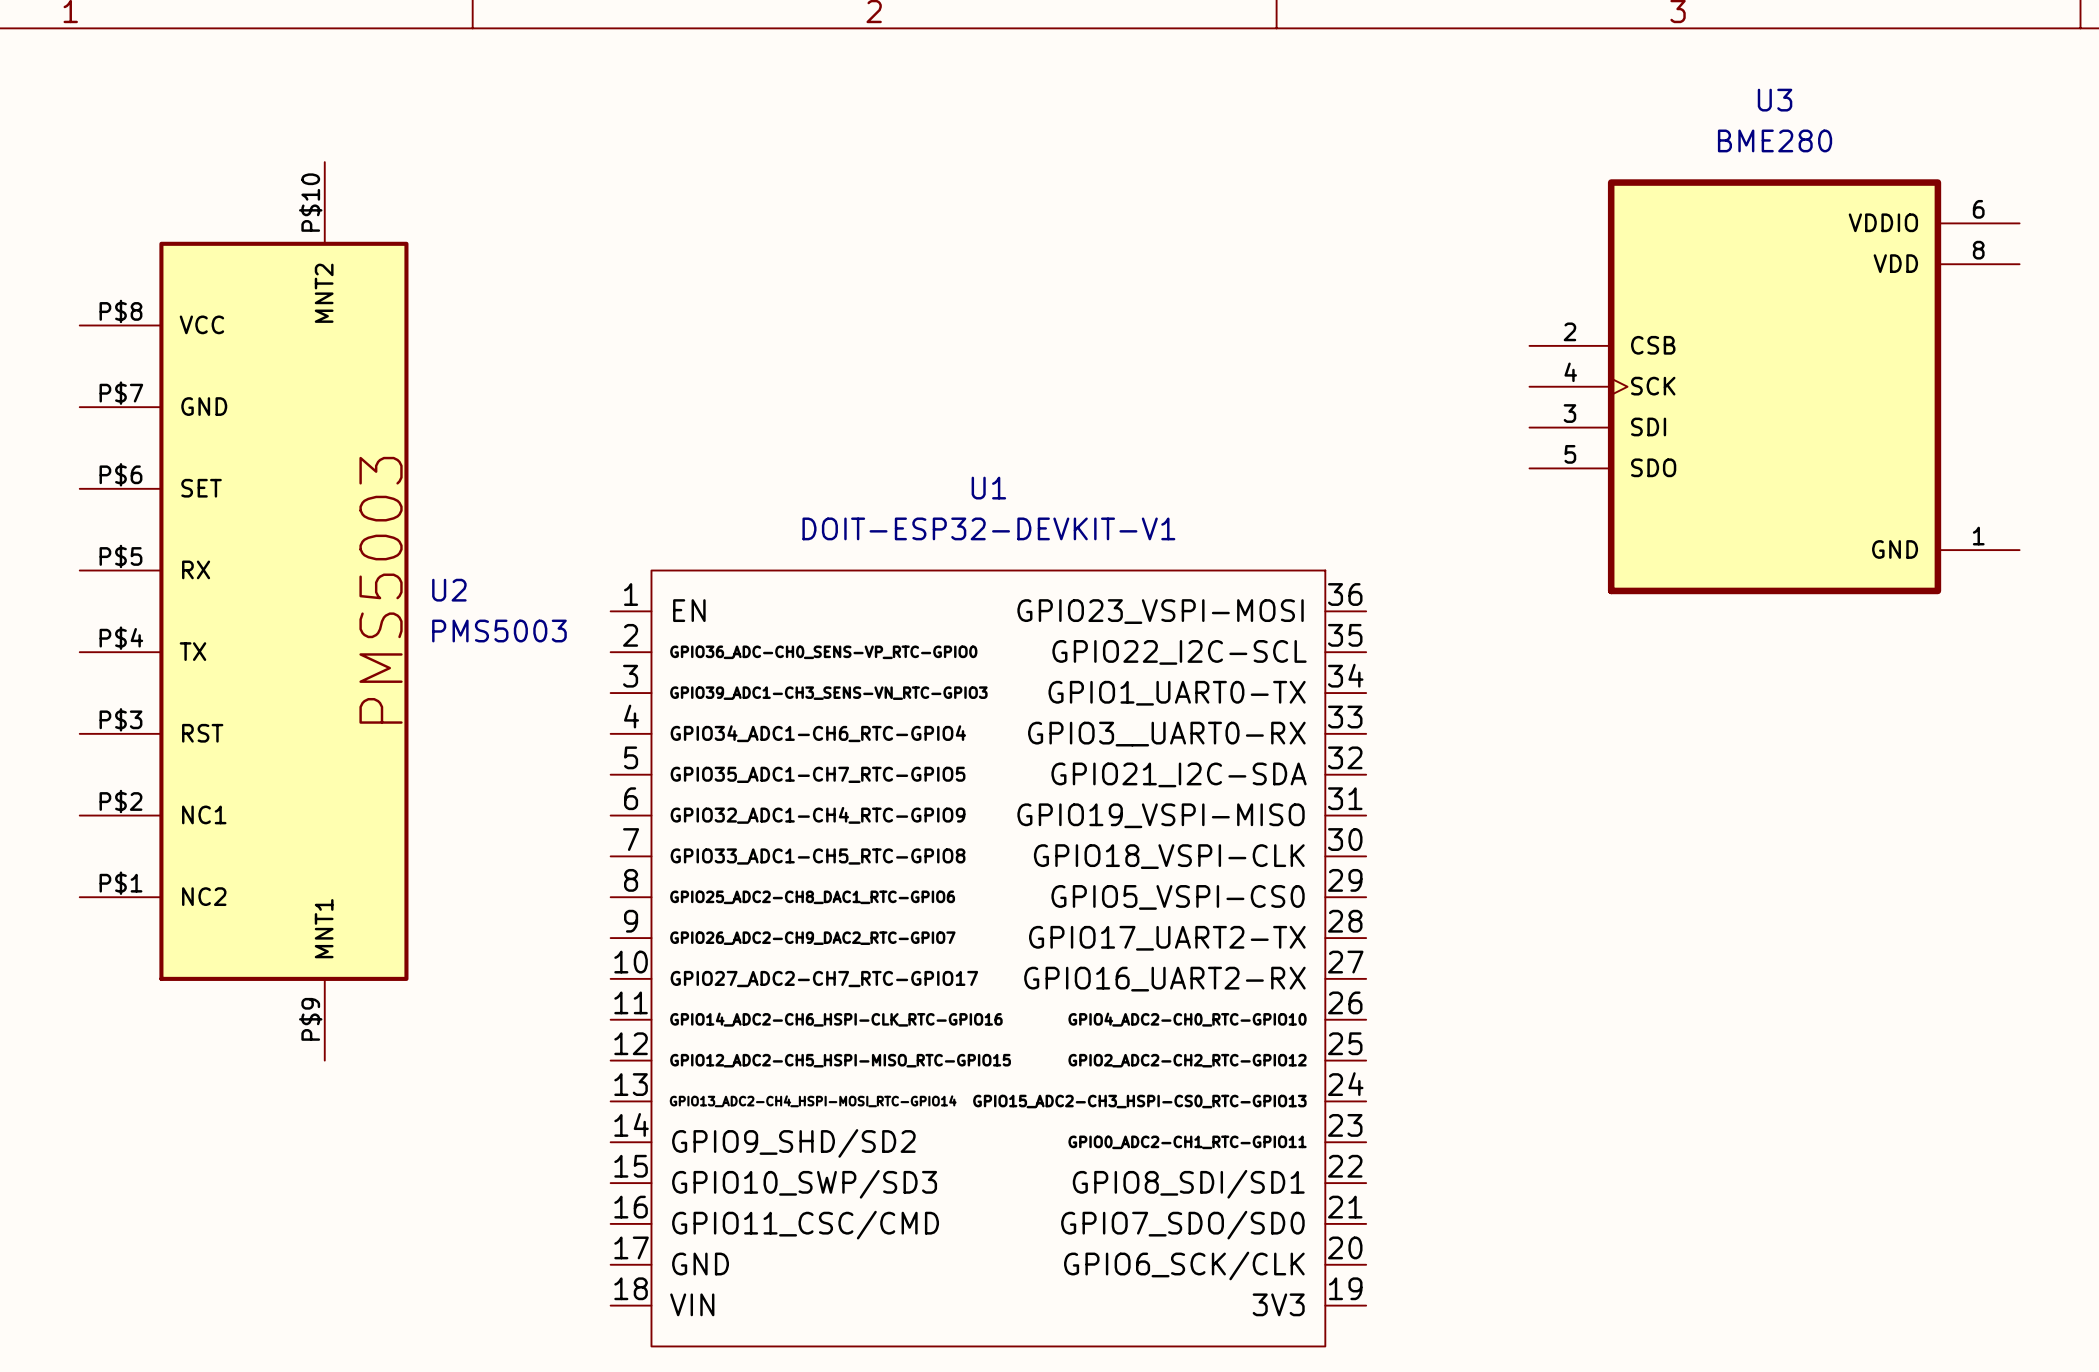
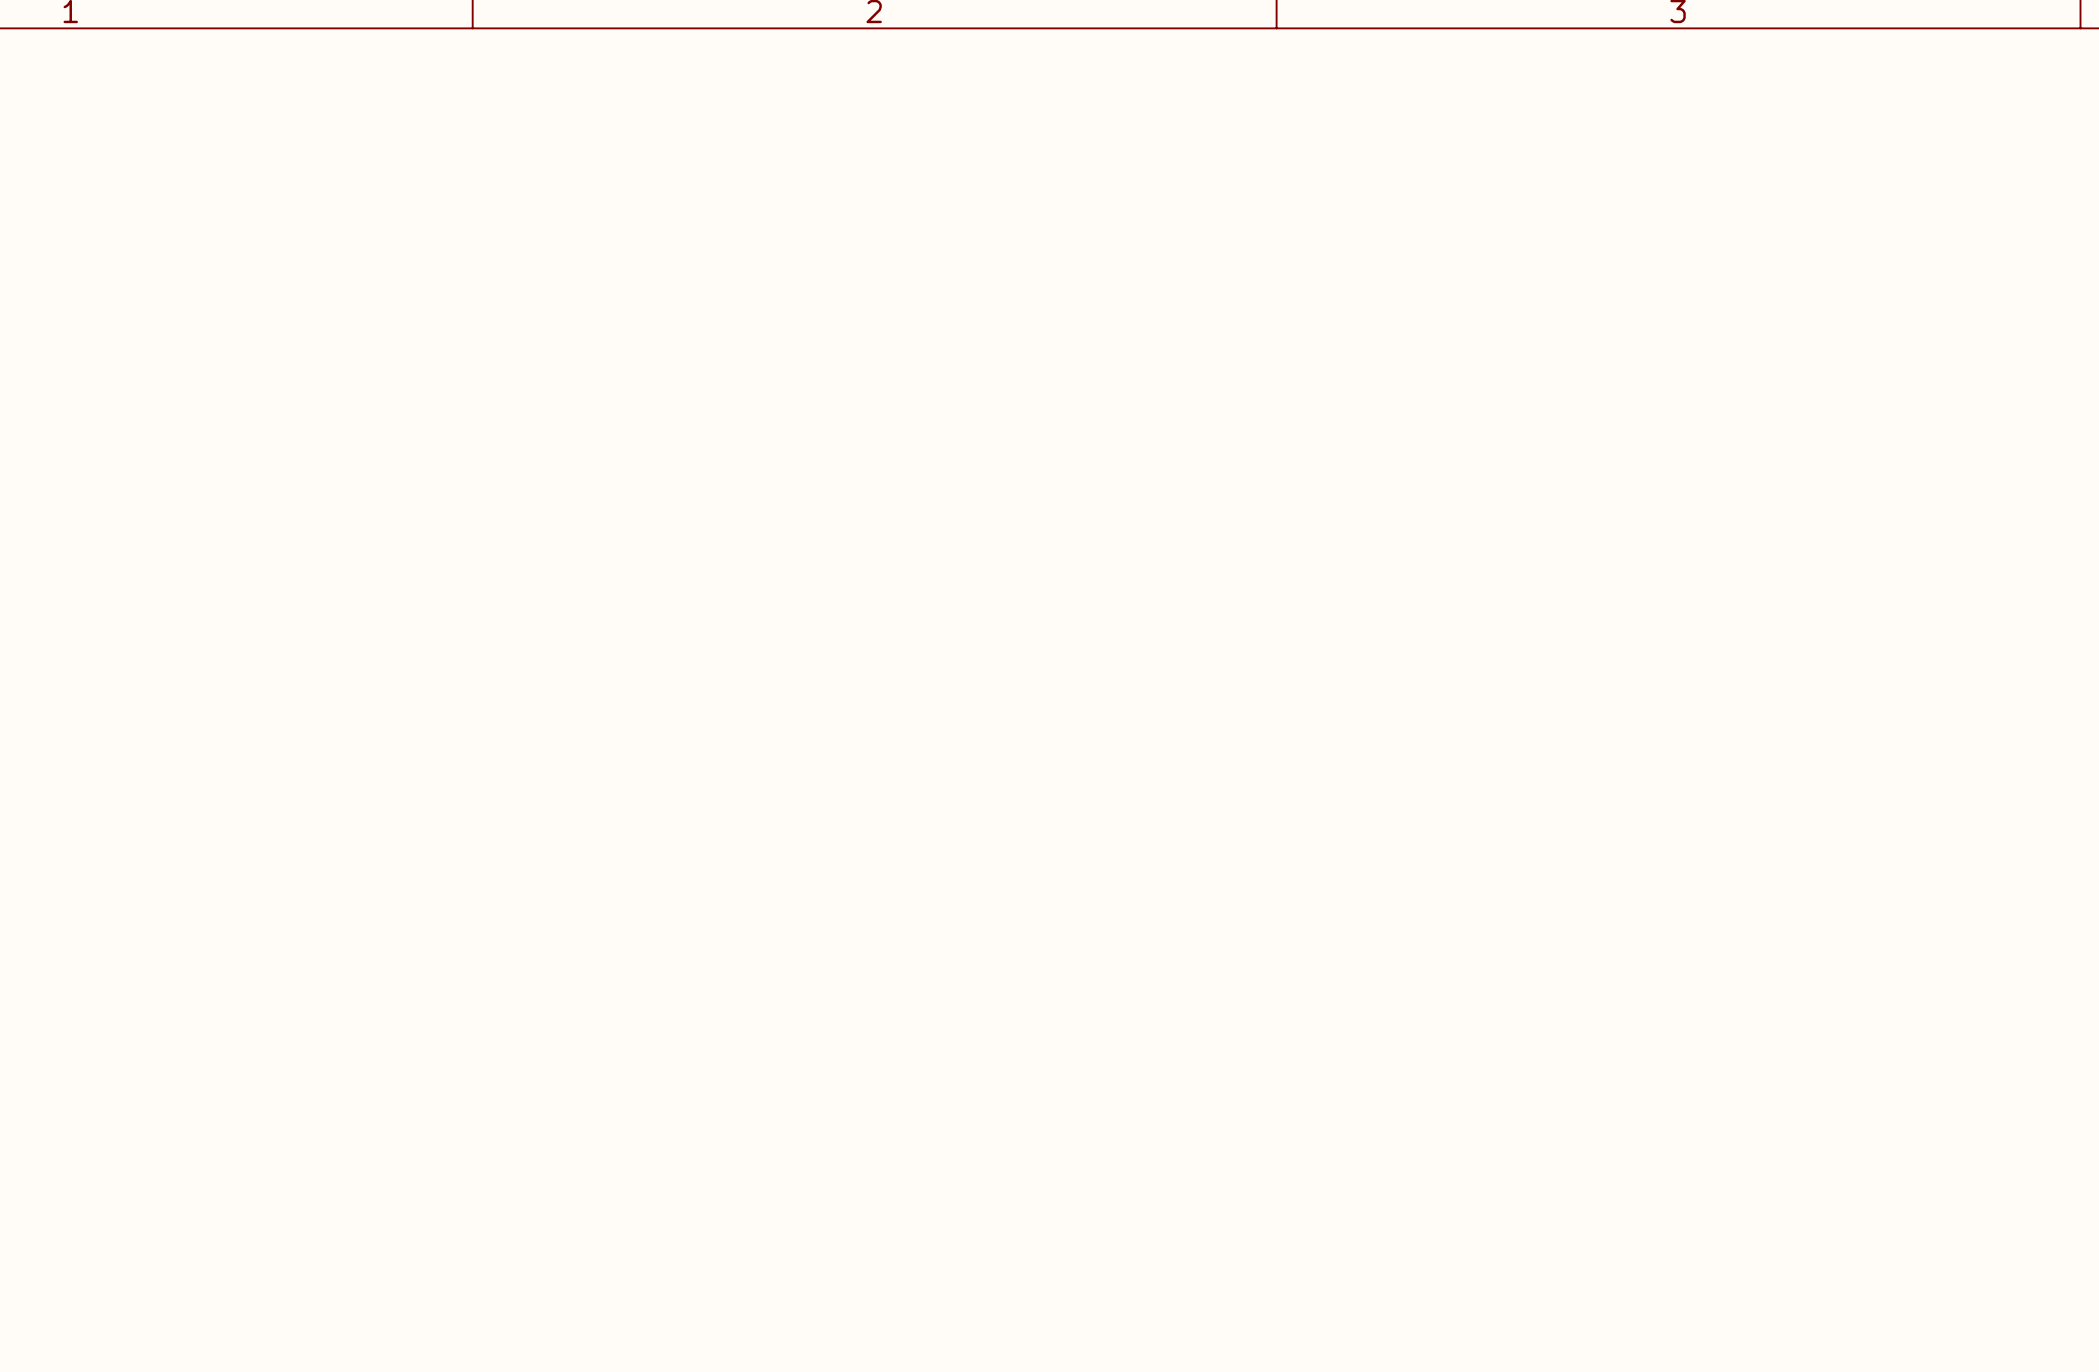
U3: BME280 (1774, 386) -> none
U2: PMS5003 (244, 611) -> none
U1: DOIT-ESP32-DEVKIT-V1 (988, 958) -> none

